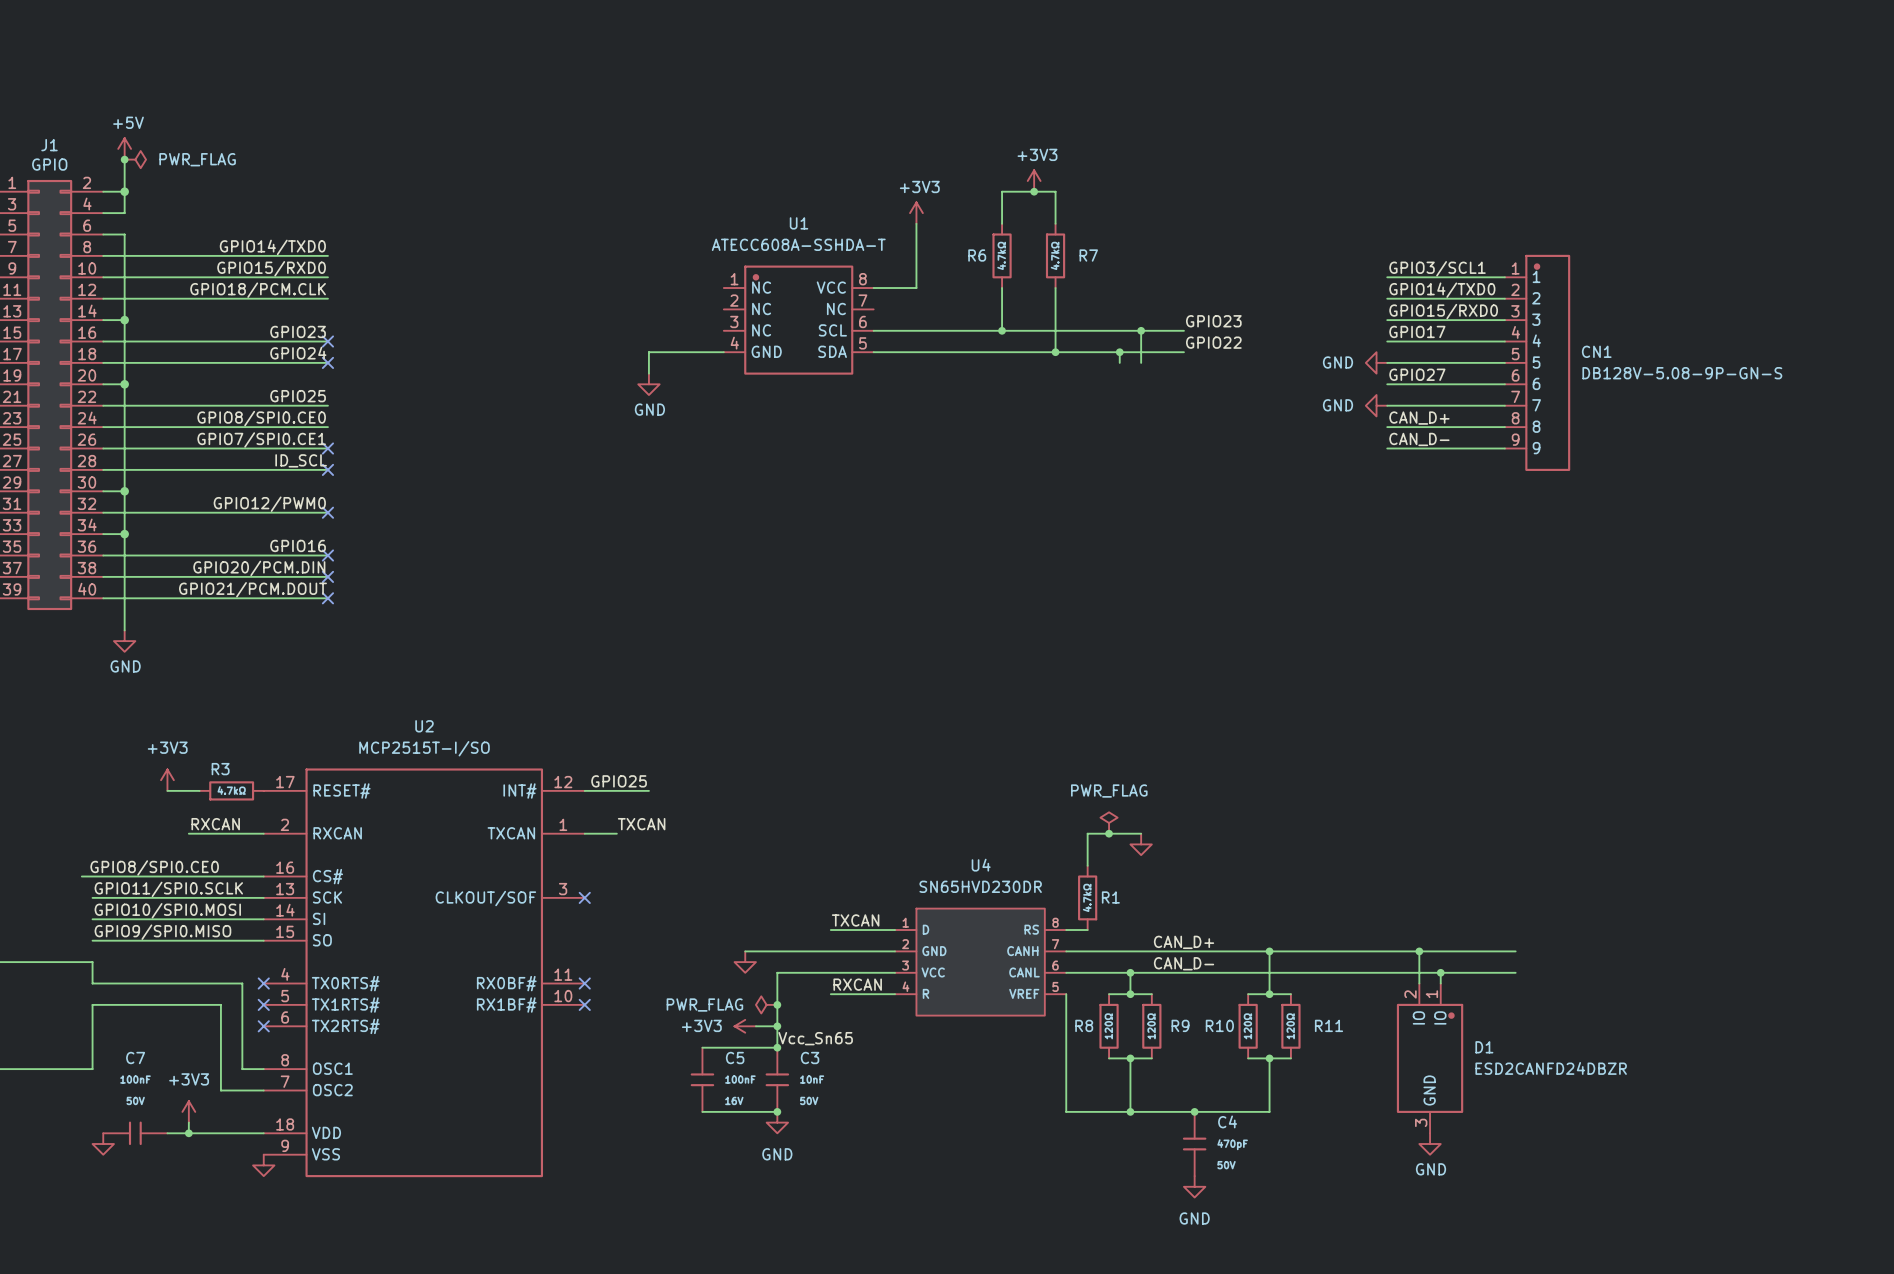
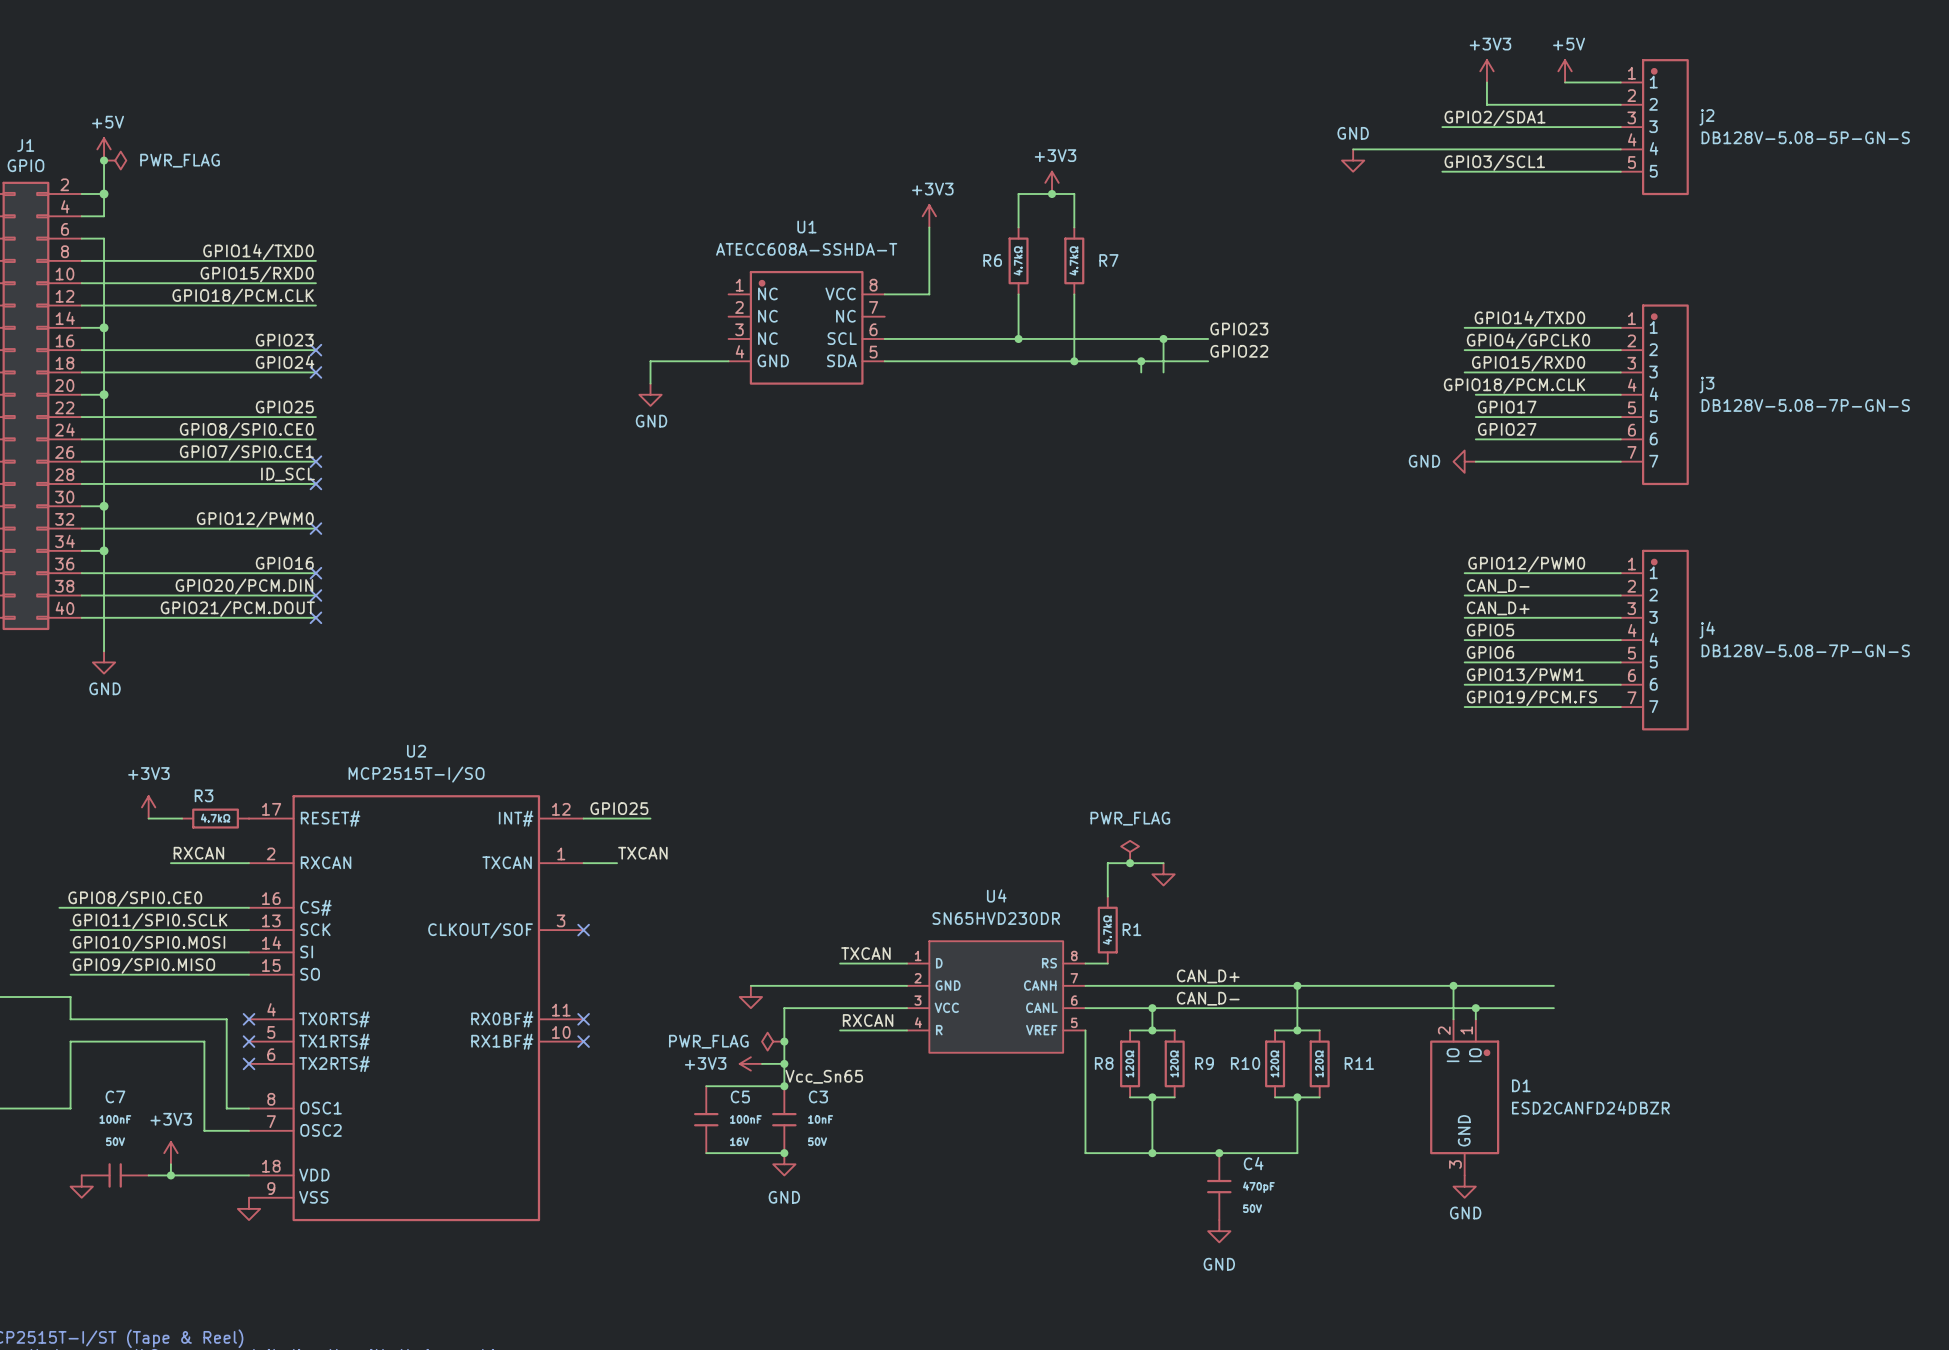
power symbol: none -> +3V3 (1486, 71)
power symbol: none -> +5V (1565, 71)
wire: none -> (1486, 82) (1486, 104) (1620, 104)
wire: none -> (1565, 82) (1620, 82)
label: none -> GPIO2/SDA1 (1495, 118)
wire: none -> (1442, 127) (1620, 127)
j2: none -> DB128V-5.08-5P-GN-S (1654, 127)
wire: none -> (1353, 149) (1620, 149)
power symbol: none -> GND (1353, 160)
wire: none -> (1442, 171) (1620, 171)
label position: GPIO3/SCL1 (1437, 268) -> GPIO3/SCL1 (1494, 162)
wire: (1387, 277) (1504, 277) -> none
label position: GPIO14/TXD0 (1442, 290) -> GPIO14/TXD0 (1529, 318)
wire: (1387, 298) (1504, 298) -> none
label position: GPIO15/RXD0 (1443, 311) -> GPIO15/RXD0 (1528, 363)
wire: (1387, 320) (1430, 320) -> none
wire: none -> (1542, 327) (1620, 327)
label position: GPIO17 (1417, 331) -> GPIO17 (1507, 407)
label: none -> GPIO4/GPCLK0 (1528, 341)
wire: (1387, 341) (1430, 341) -> none
wire: none -> (1542, 350) (1620, 350)
power symbol: GND (1376, 362) -> none
wire: (1387, 362) (1430, 362) -> none
wire: none -> (1542, 372) (1620, 372)
CN1: DB128V-5.08-9P-GN-S (1537, 362) -> none
label position: GPIO27 (1417, 374) -> GPIO27 (1507, 429)
label: none -> GPIO18/PCM.CLK (1514, 385)
wire: (1387, 384) (1440, 384) -> none
wire: none -> (1542, 394) (1620, 394)
j3: none -> DB128V-5.08-7P-GN-S (1654, 394)
power symbol: GND (1376, 405) -> none
wire: (1387, 405) (1440, 405) -> none
wire: none -> (1542, 417) (1620, 417)
label position: CAN_D+ (1419, 418) -> CAN_D+ (1498, 608)
wire: (1387, 427) (1440, 427) -> none
wire: none -> (1542, 439) (1620, 439)
label position: CAN_D- (1419, 439) -> CAN_D- (1498, 586)
wire: (1387, 448) (1440, 448) -> none
power symbol: none -> GND (1464, 461)
wire: none -> (1542, 461) (1620, 461)
label: none -> GPIO12/PWM0 (1526, 564)
wire: none -> (1464, 573) (1620, 573)
wire: none -> (1464, 595) (1620, 595)
wire: none -> (1464, 617) (1620, 617)
label: none -> GPIO5 (1490, 630)
wire: none -> (1464, 640) (1620, 640)
j4: none -> DB128V-5.08-7P-GN-S (1654, 640)
label: none -> GPIO6 (1490, 652)
wire: none -> (1464, 662) (1620, 662)
label: none -> GPIO13/PWM1 (1525, 675)
wire: none -> (1464, 684) (1620, 684)
label: none -> GPIO19/PCM.FS (1531, 698)
wire: none -> (1464, 707) (1620, 707)

